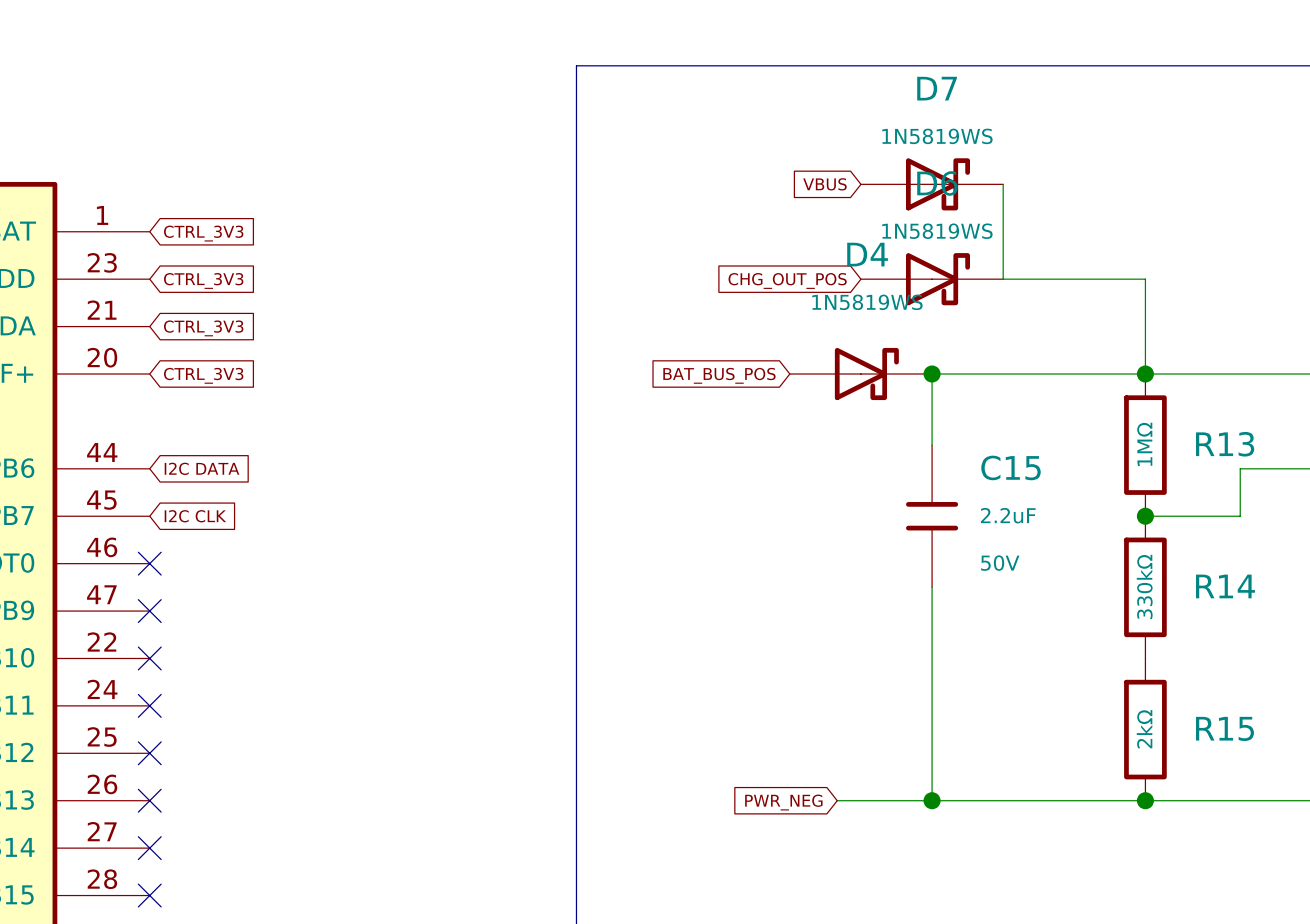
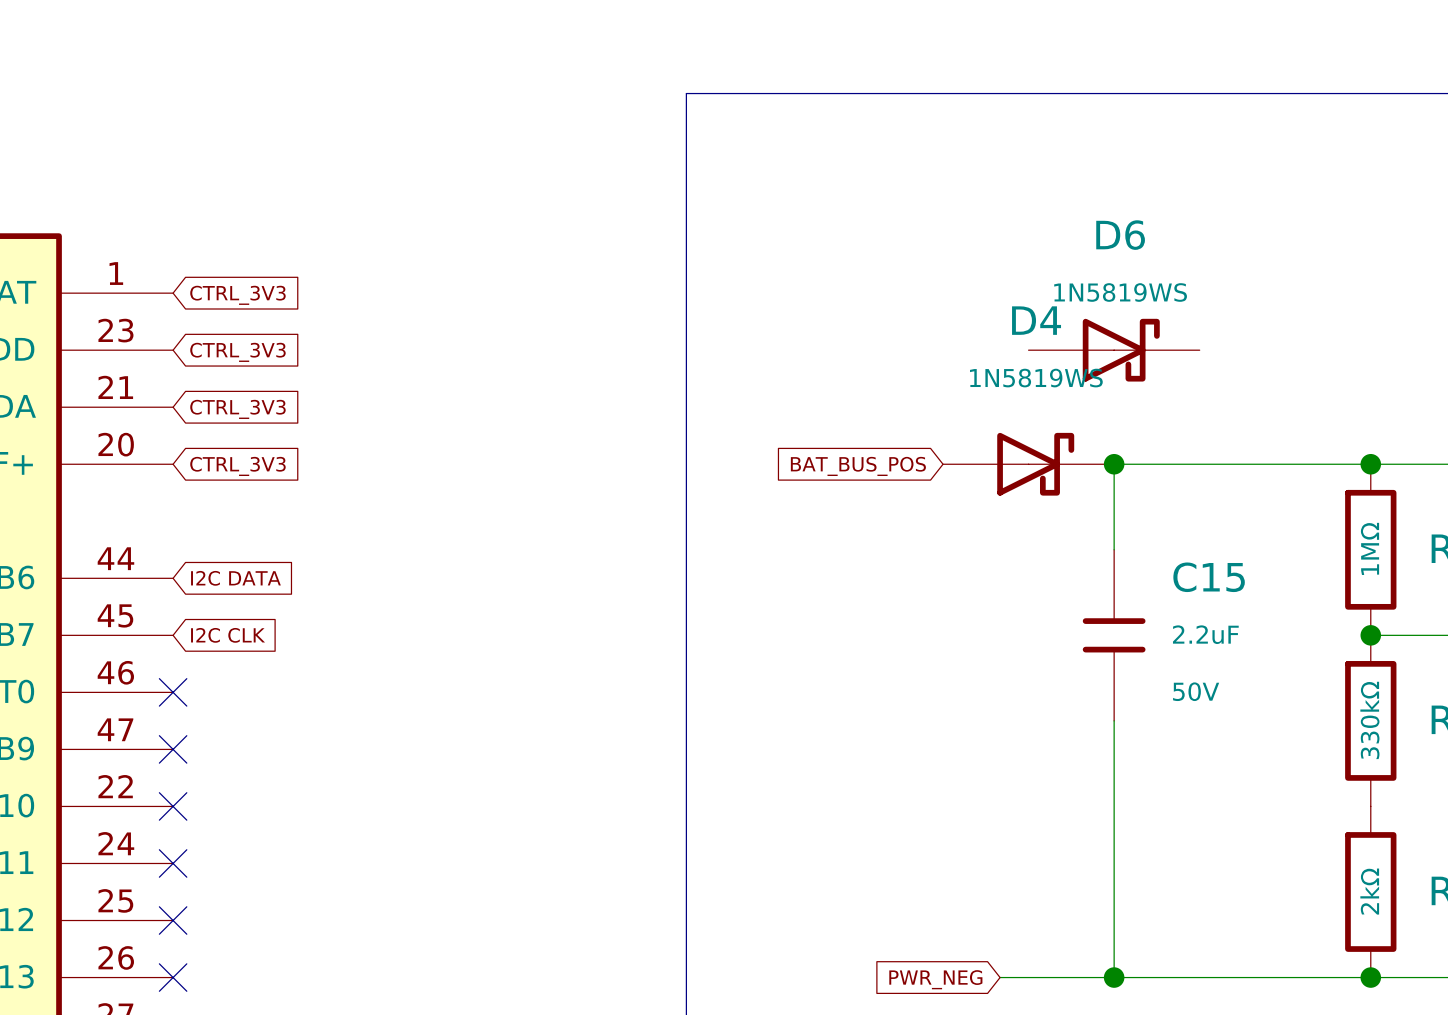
global label: VBUS (824, 184) -> none
D7: 1N5819WS (932, 184) -> none
wire: (1003, 184) (1003, 279) (1145, 279) (1145, 374) -> none
global label: CHG_OUT_POS (787, 280) -> none

